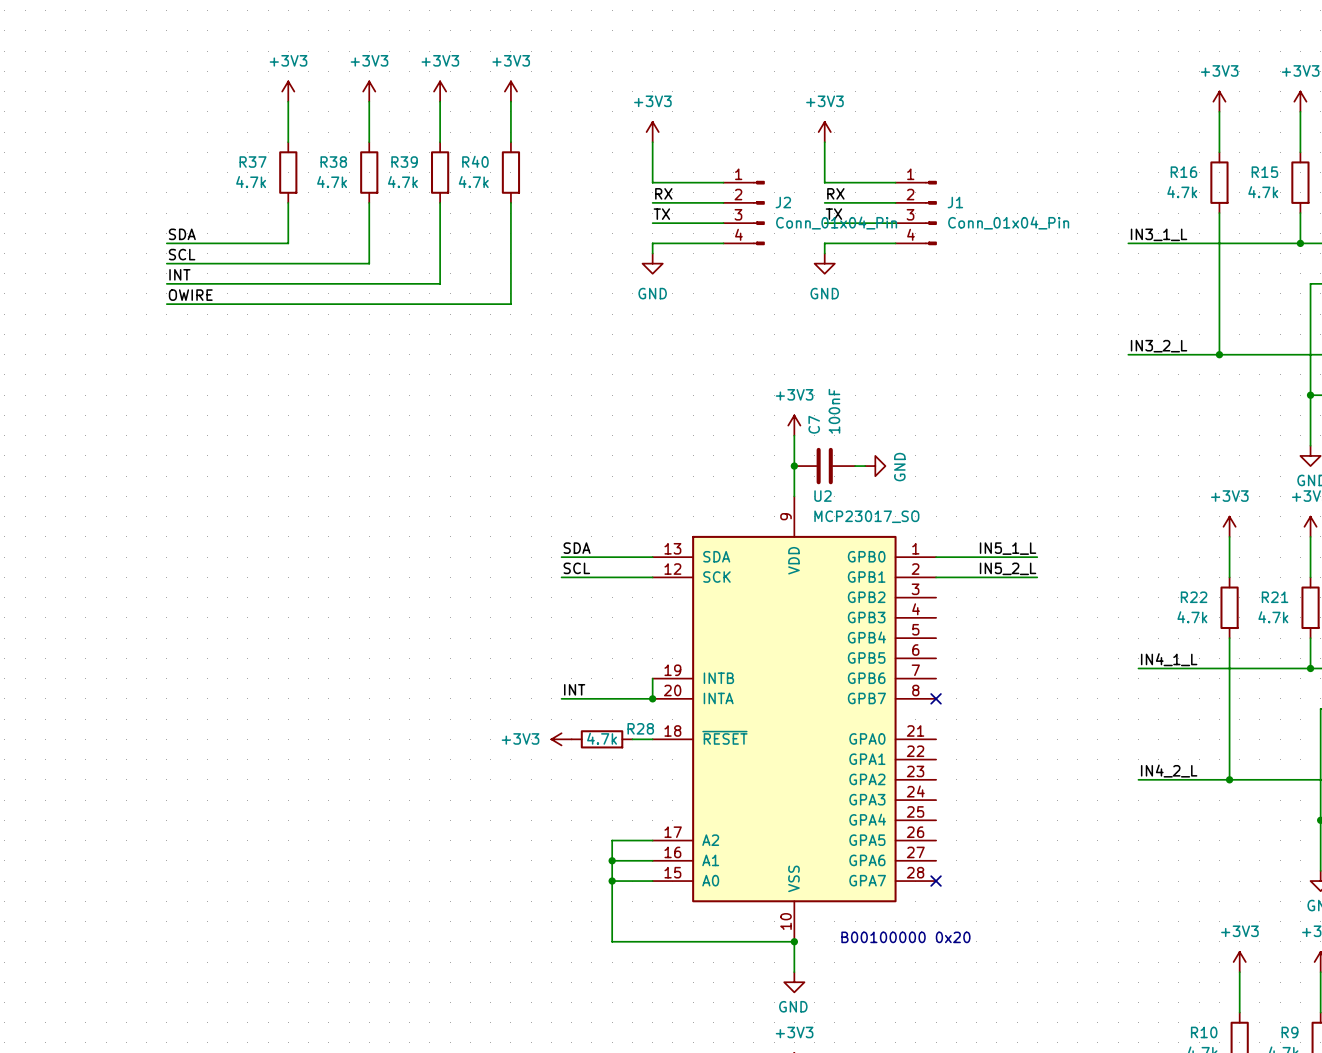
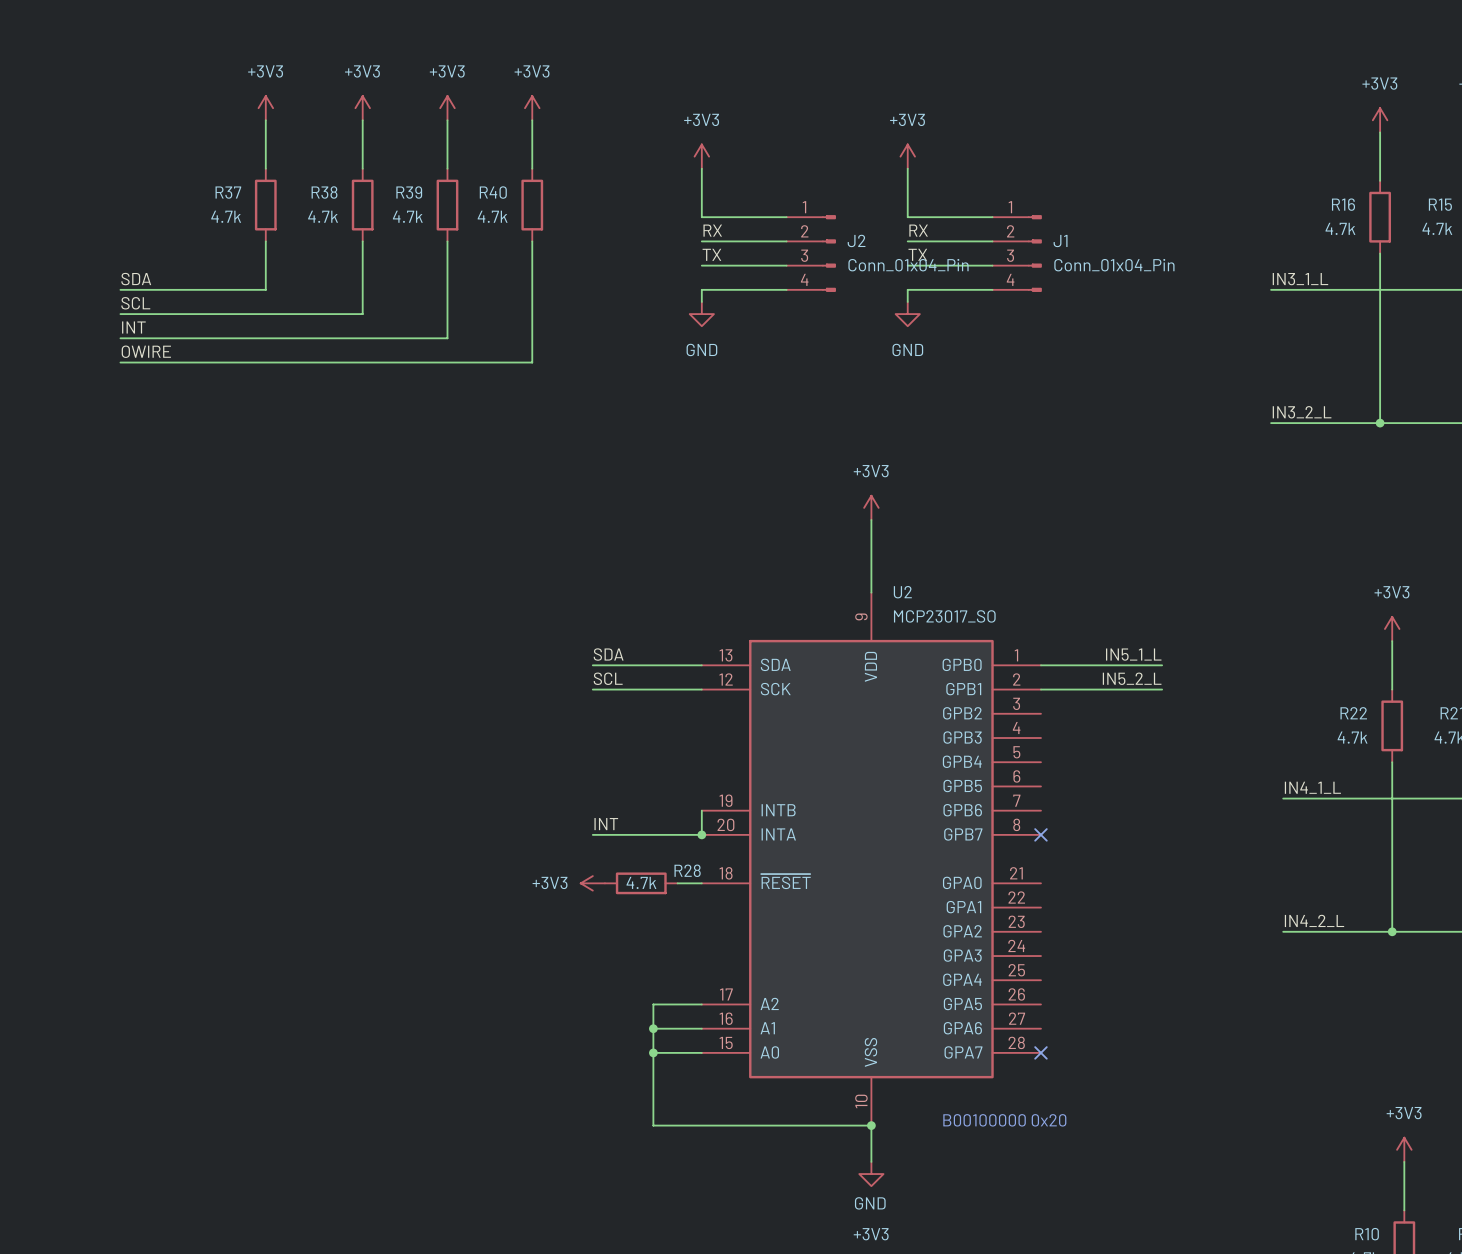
junction: (794, 466) -> none
C7: 100nF (824, 466) -> none
wire: (855, 466) (865, 466) -> none
power symbol: GND (875, 466) -> none

